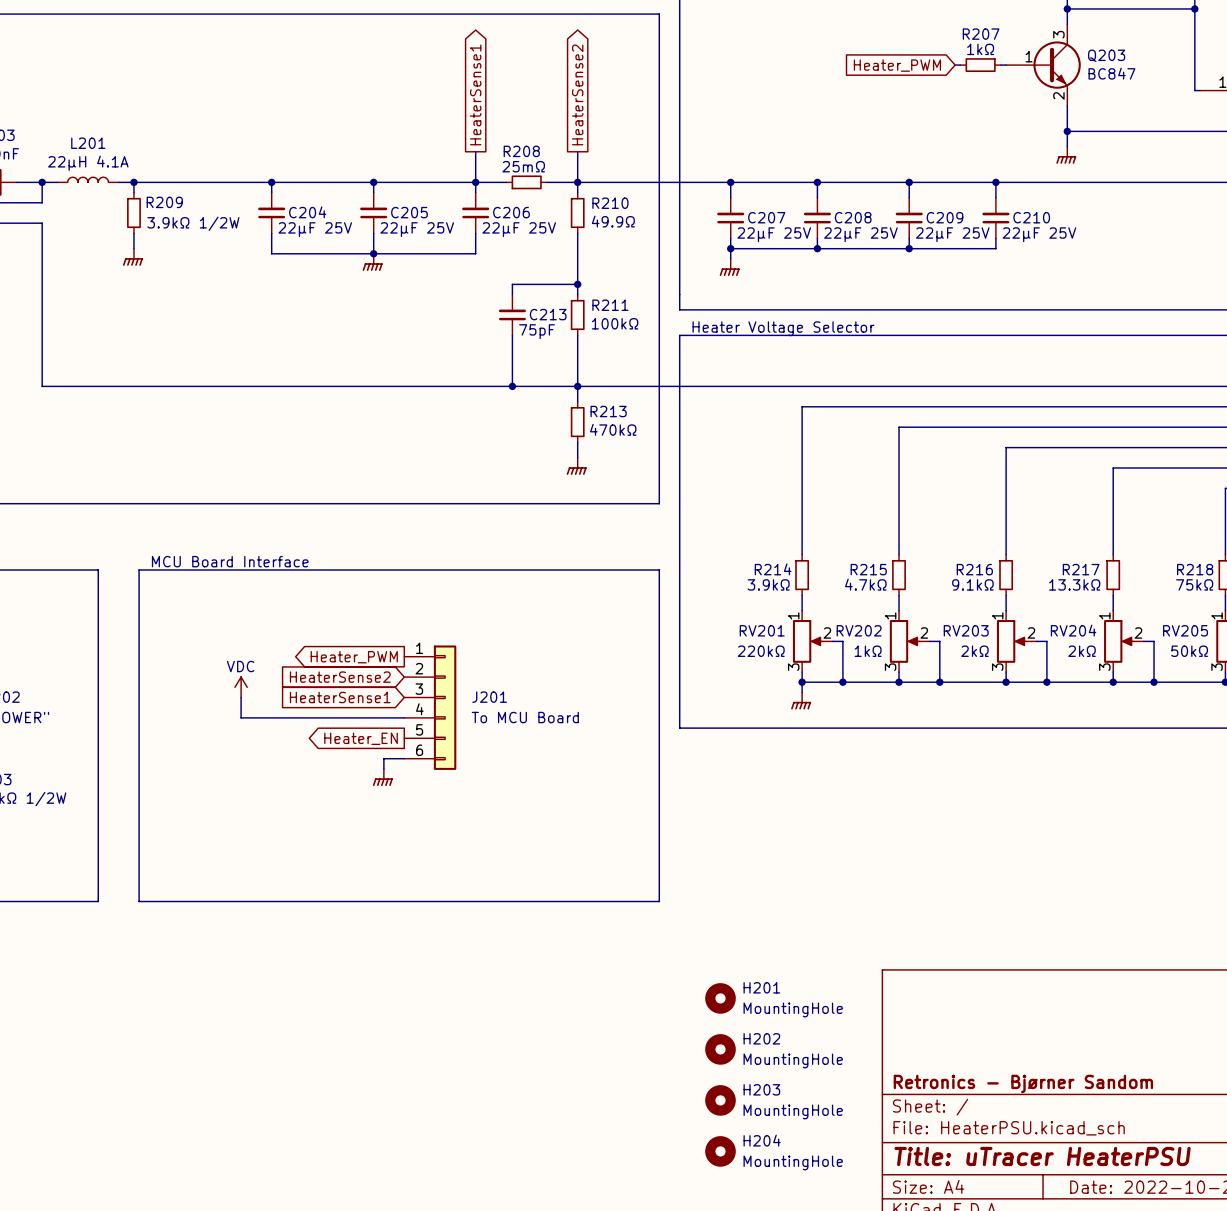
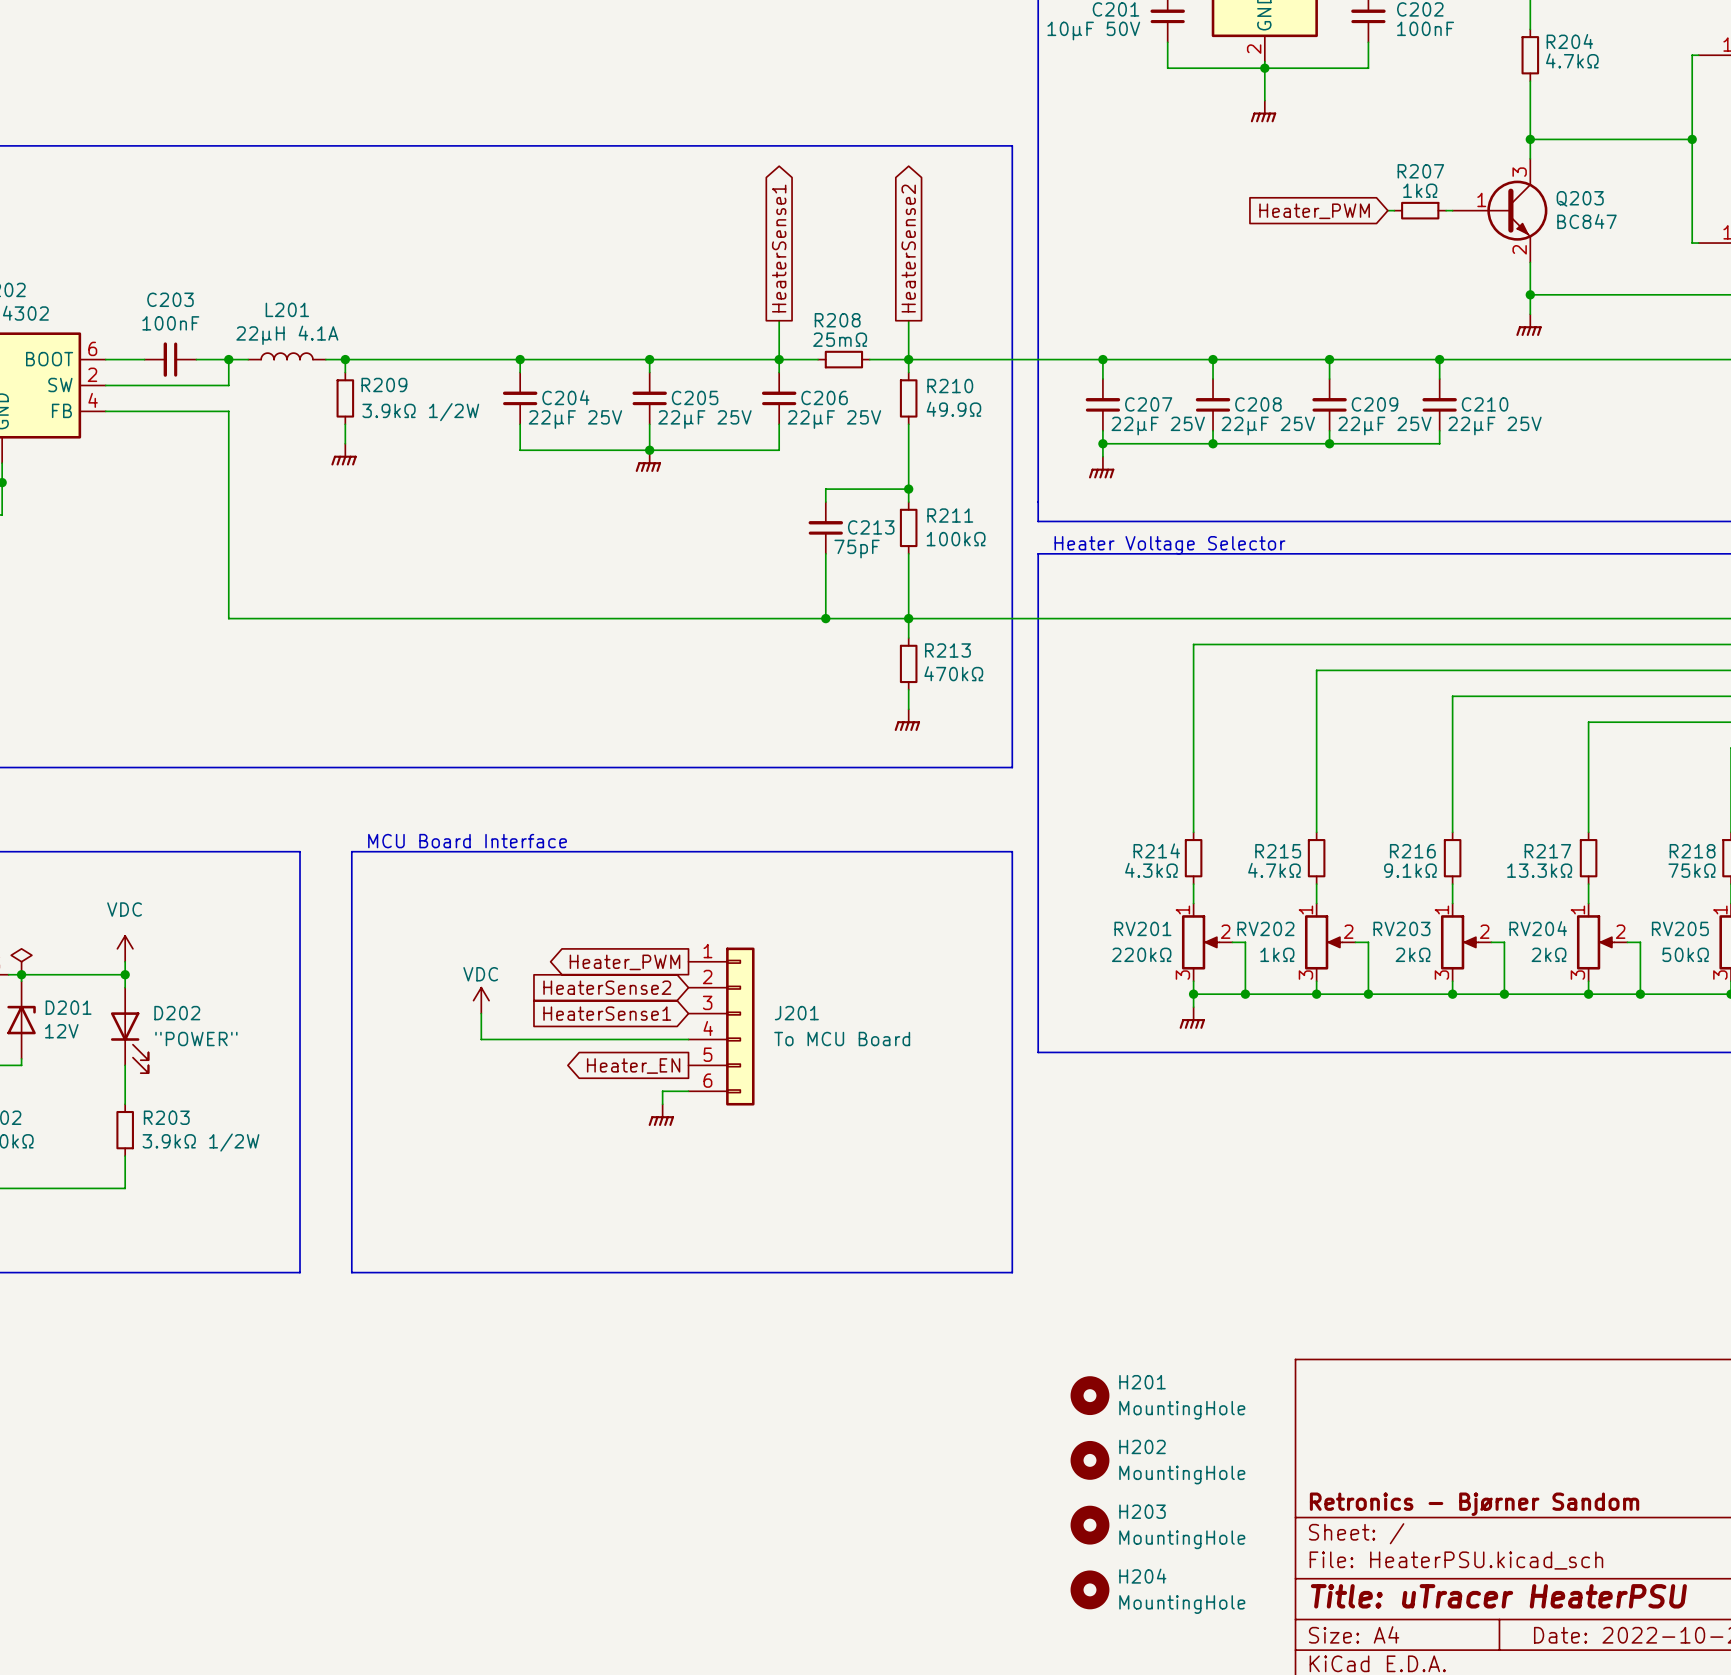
R214 value: 3.9kΩ (768, 584) -> 4.3kΩ (1151, 870)

